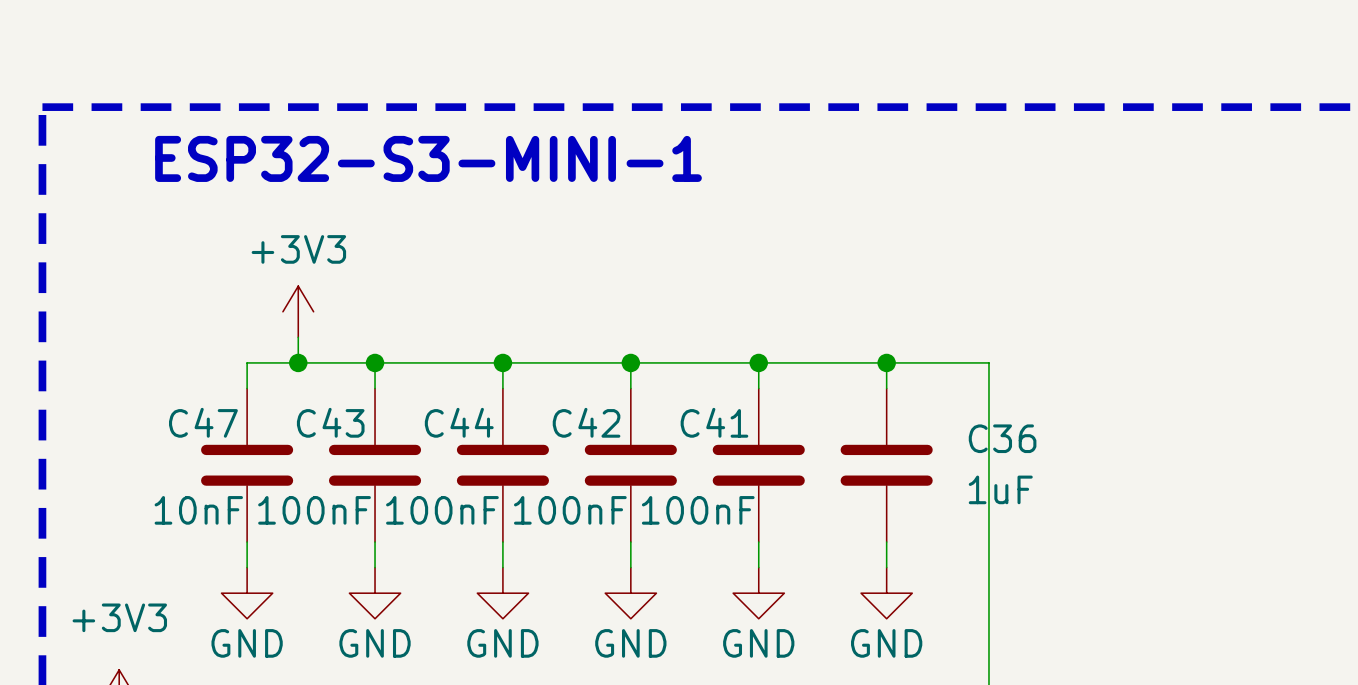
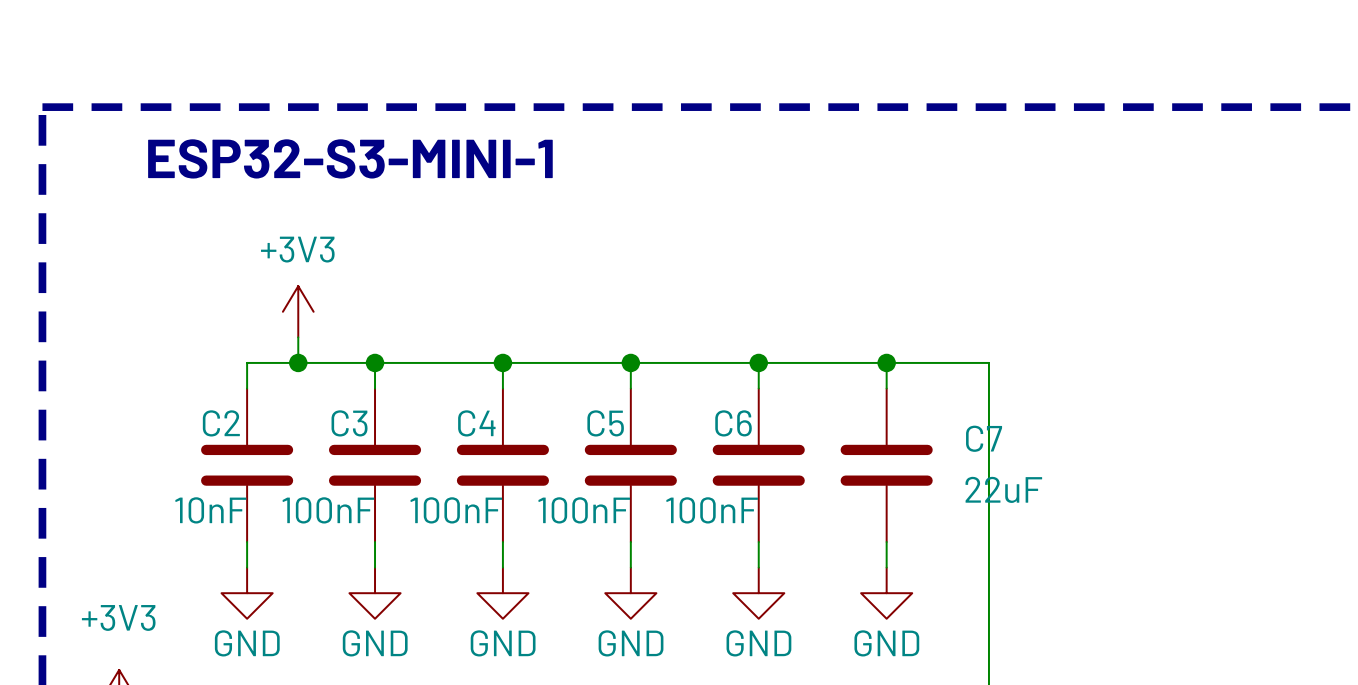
C47 name: C47 (203, 422) -> C2 (221, 423)
C43 name: C43 (330, 422) -> C3 (349, 423)
C44 name: C44 (459, 422) -> C4 (476, 423)
C42 name: C42 (586, 422) -> C5 (605, 423)
C41 name: C41 (714, 422) -> C6 (733, 423)
C36 name: C36 (1002, 438) -> C7 (984, 438)
C36 value: 1uF (1000, 489) -> 22uF (1003, 489)

